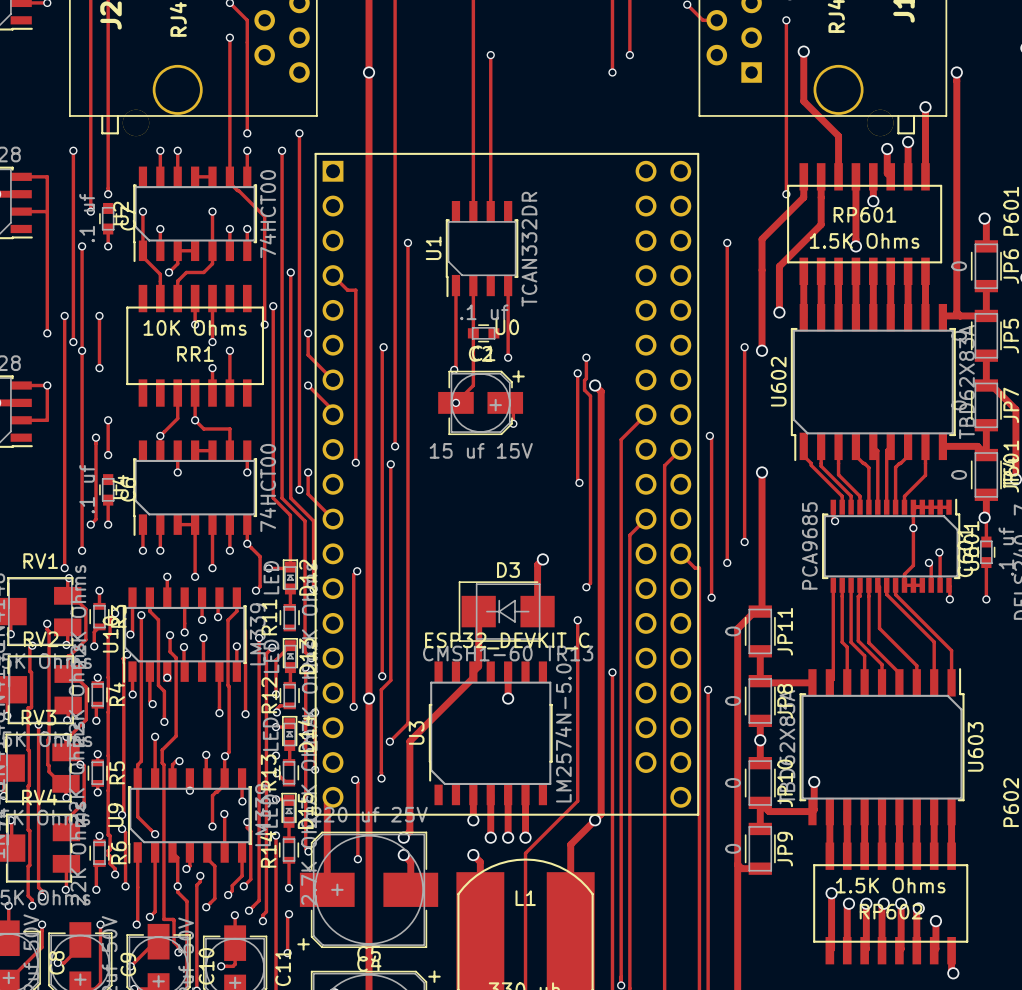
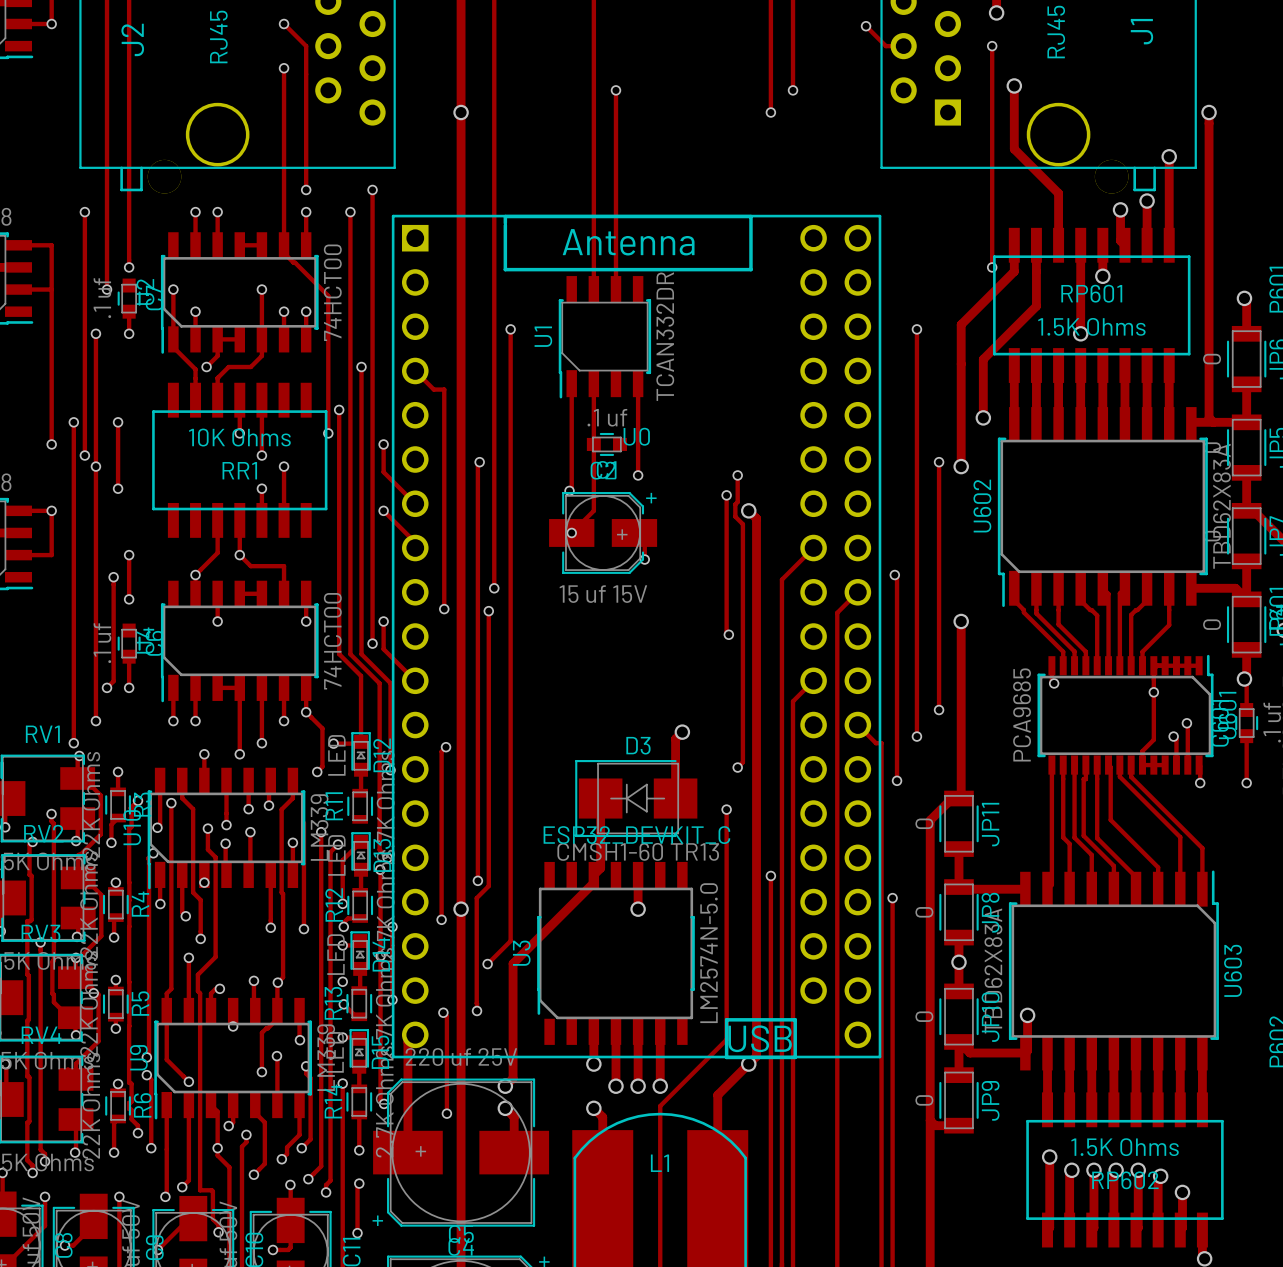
line: none -> (505, 223) (505, 216) (750, 216) (750, 269) (505, 269) (505, 225)
text: none -> Antenna (628, 242)
line: none -> (726, 1019) (726, 1057) (795, 1057) (795, 1019) (726, 1019)
text: none -> USB (760, 1038)

